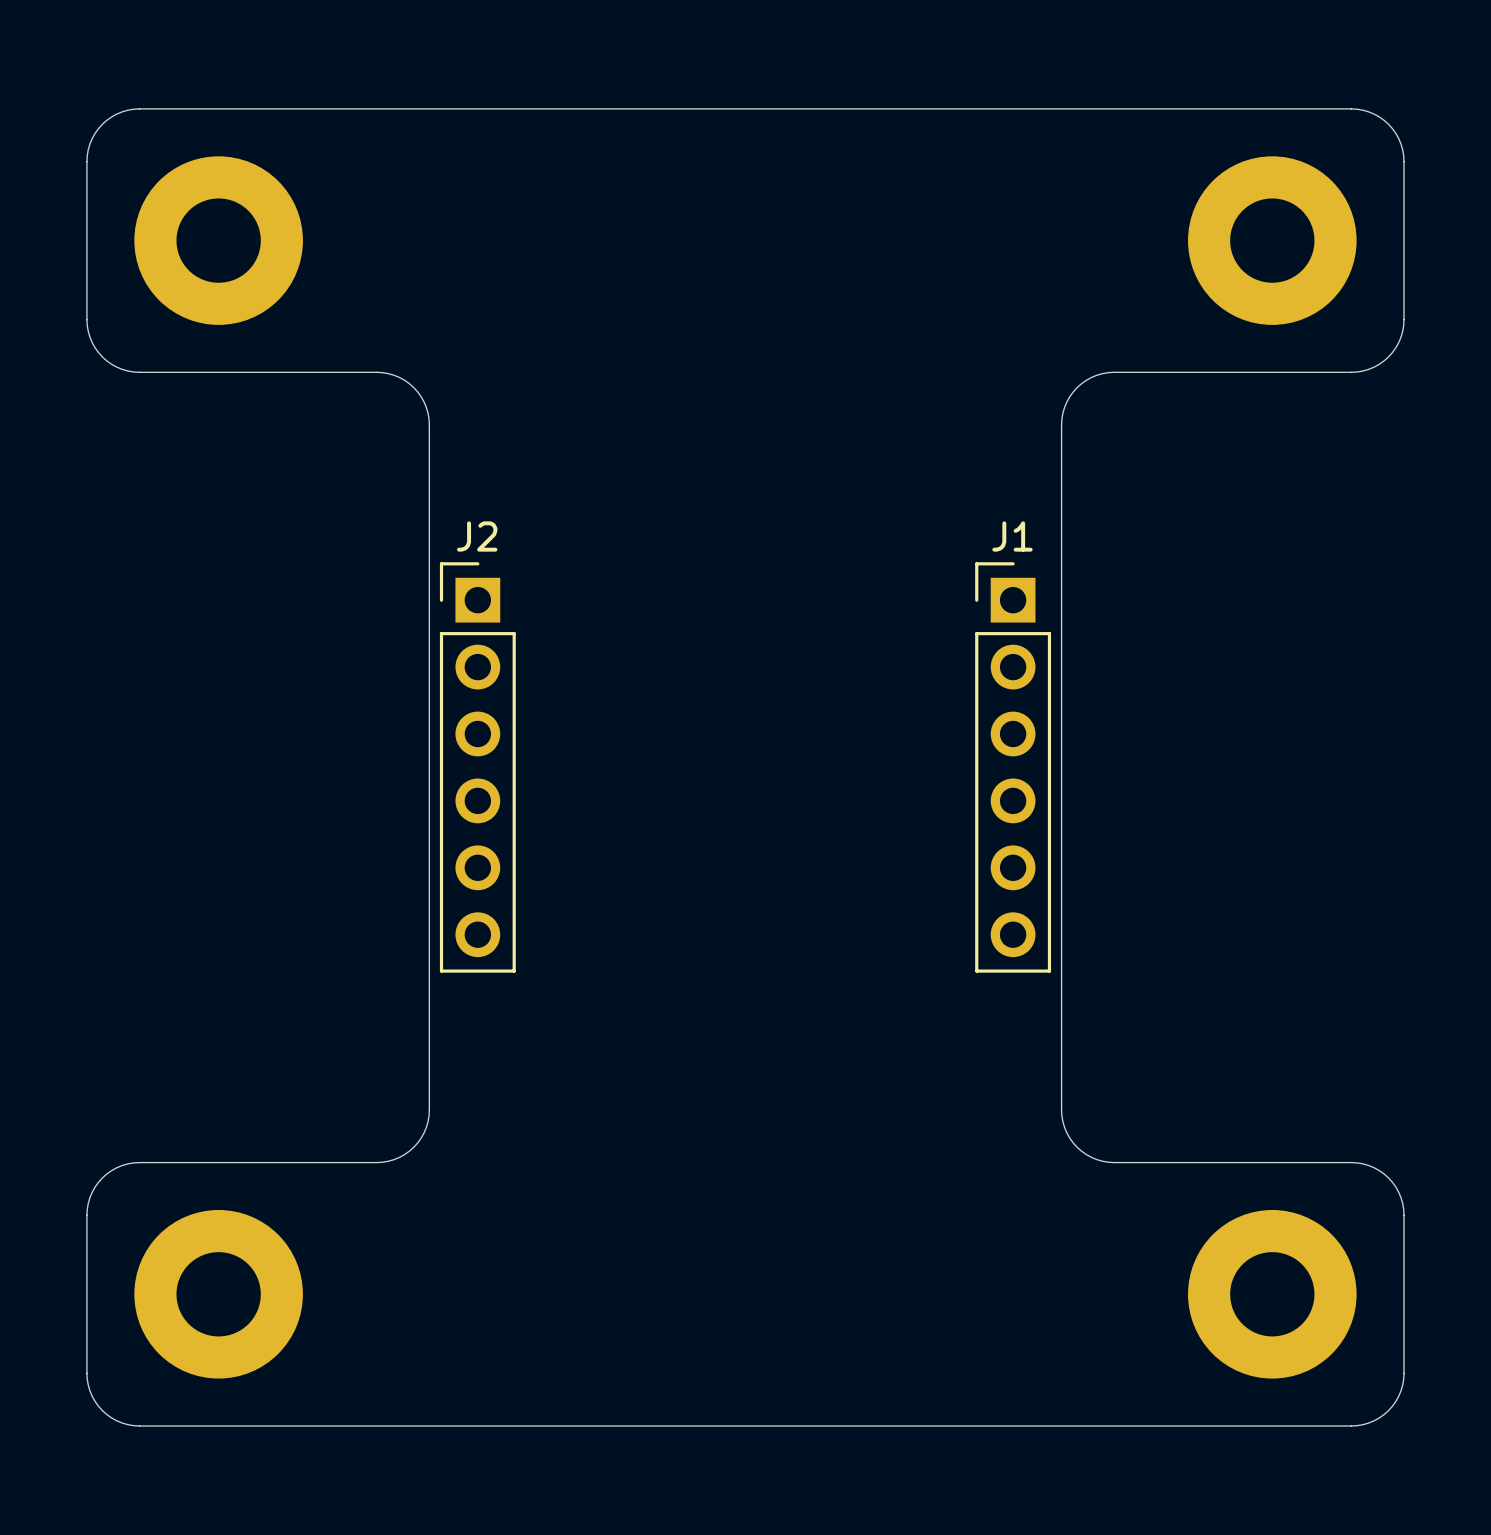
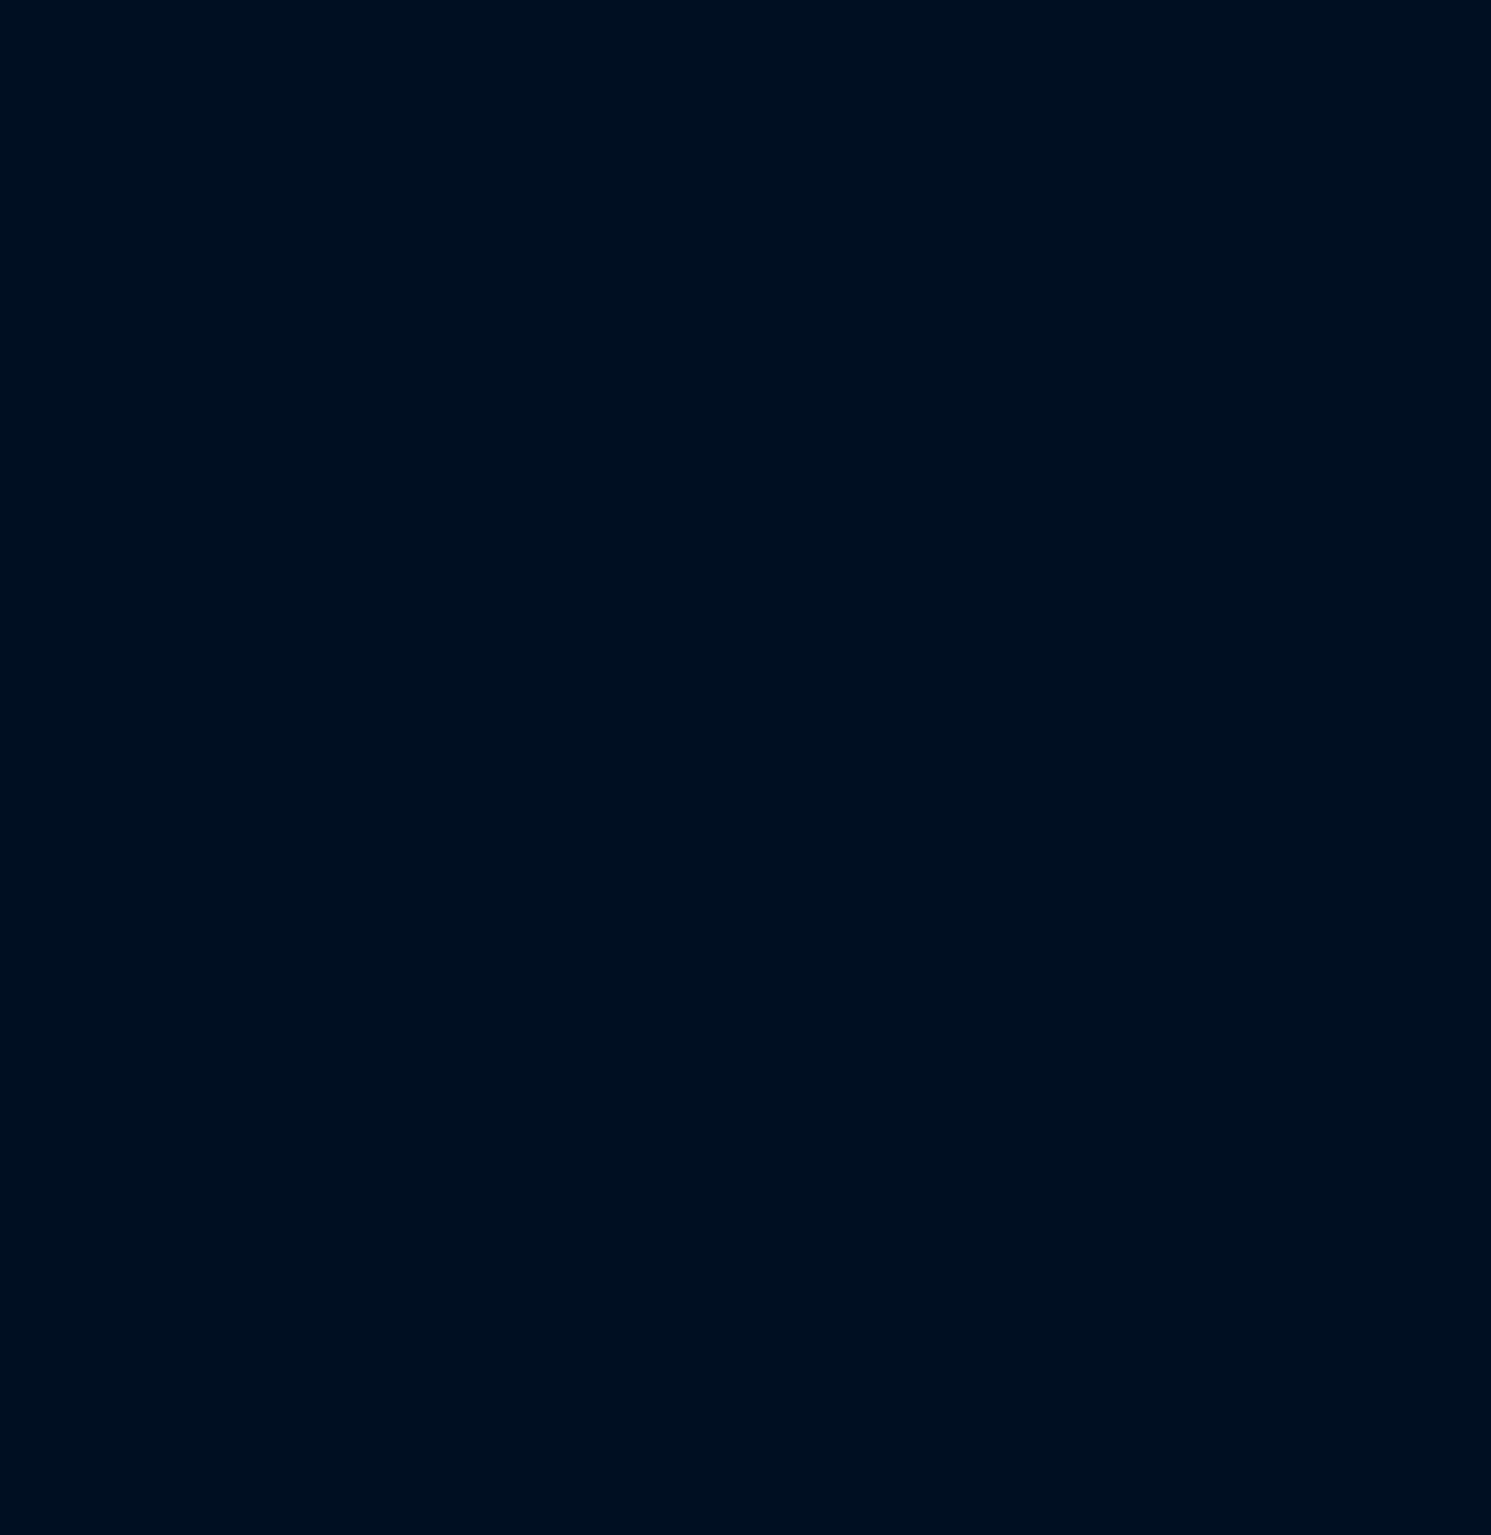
board edge: (1351, 108) (139, 108) (122, 111) (102, 124) (92, 138) (87, 155) (86, 319) (89, 337) (102, 356) (116, 367) (133, 371) (388, 373) (404, 380) (417, 392) (426, 407) (429, 425) (429, 1109) (426, 1127) (417, 1142) (409, 1151) (394, 1159) (382, 1162) (139, 1162) (122, 1165) (106, 1174) (92, 1192) (86, 1215) (87, 1379) (92, 1396) (102, 1410) (116, 1420) (139, 1425) (1351, 1425) (1374, 1420) (1388, 1410) (1398, 1396) (1404, 1373) (1403, 1209) (1398, 1192) (1388, 1178) (1374, 1167) (1357, 1162) (1102, 1161) (1086, 1154) (1073, 1142) (1064, 1127) (1061, 1109) (1061, 425) (1064, 407) (1073, 392) (1081, 383) (1091, 377) (1108, 372) (1357, 371) (1374, 367) (1388, 356) (1398, 342) (1403, 325) (1403, 155) (1398, 138) (1384, 120) (1368, 111) (1351, 108) -> none
part: (218, 240) -> none
part: (1272, 240) -> none
J2: (477, 767) -> none
J1: (1013, 767) -> none
part: (218, 1294) -> none
part: (1272, 1294) -> none

